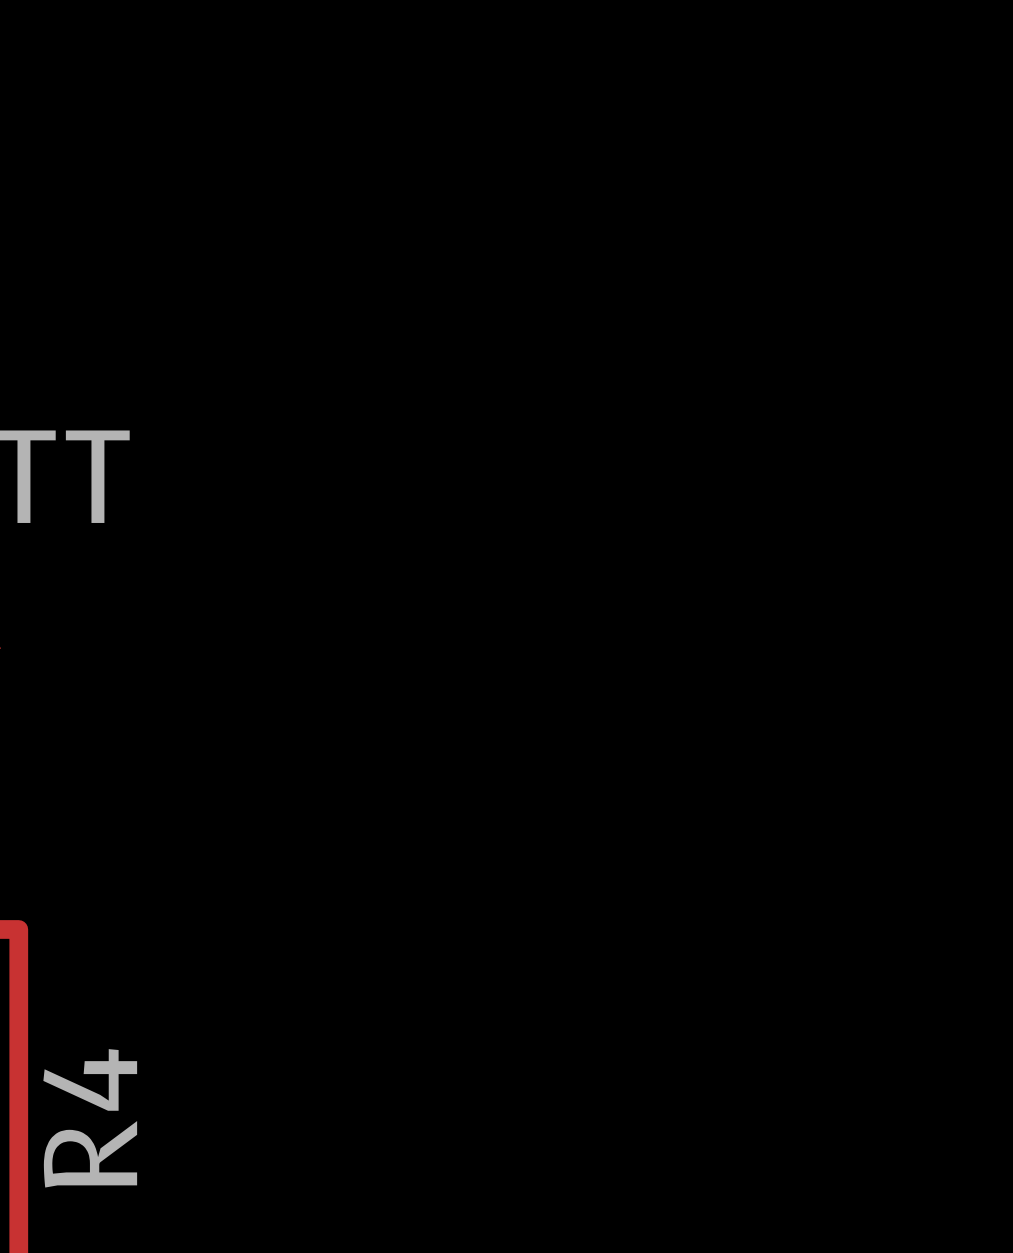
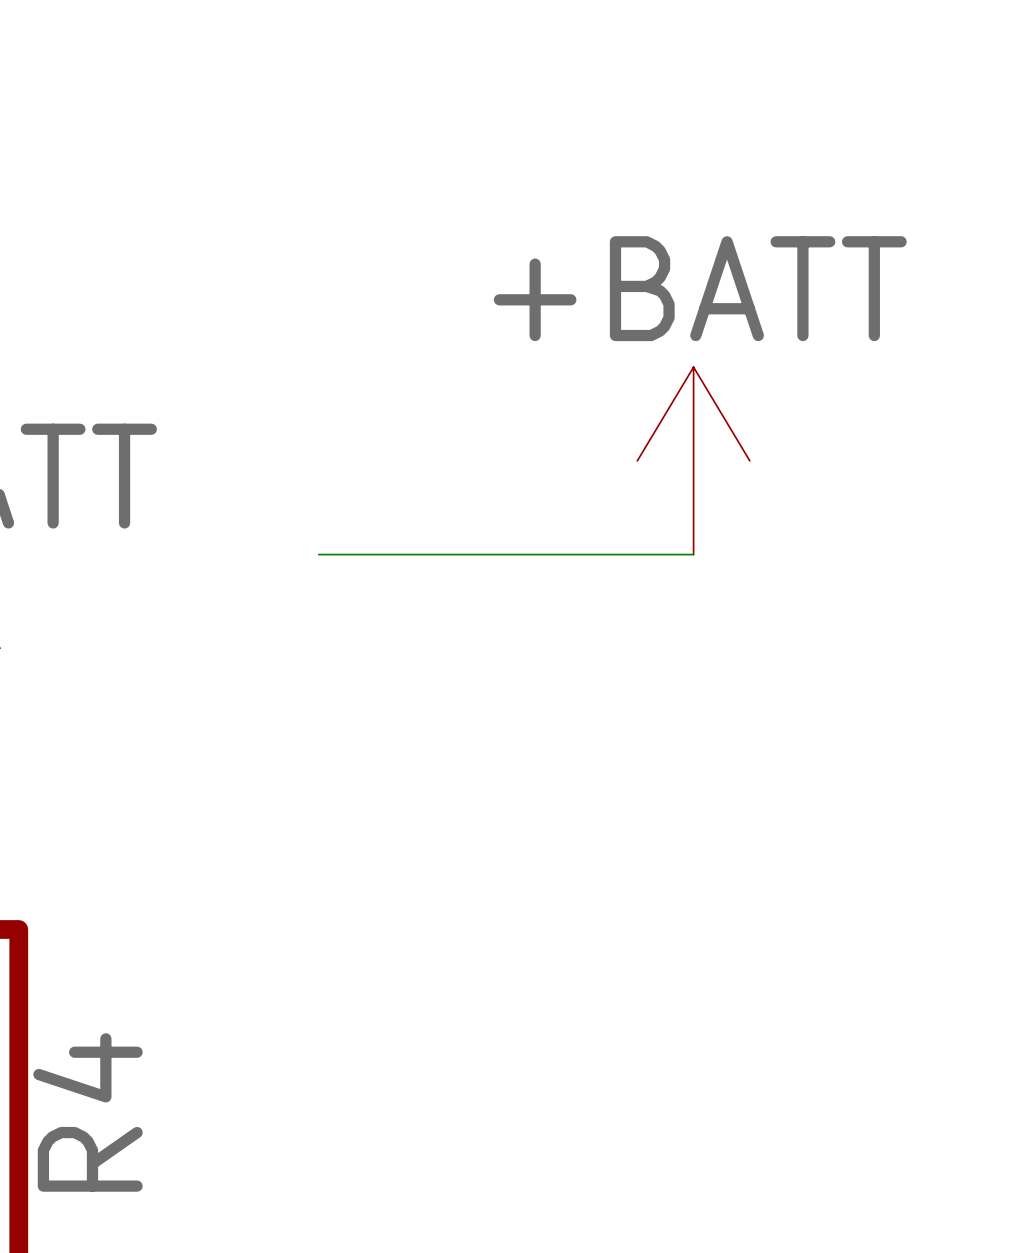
power symbol: none -> +BATT (693, 460)
wire: none -> (318, 554) (693, 554)

